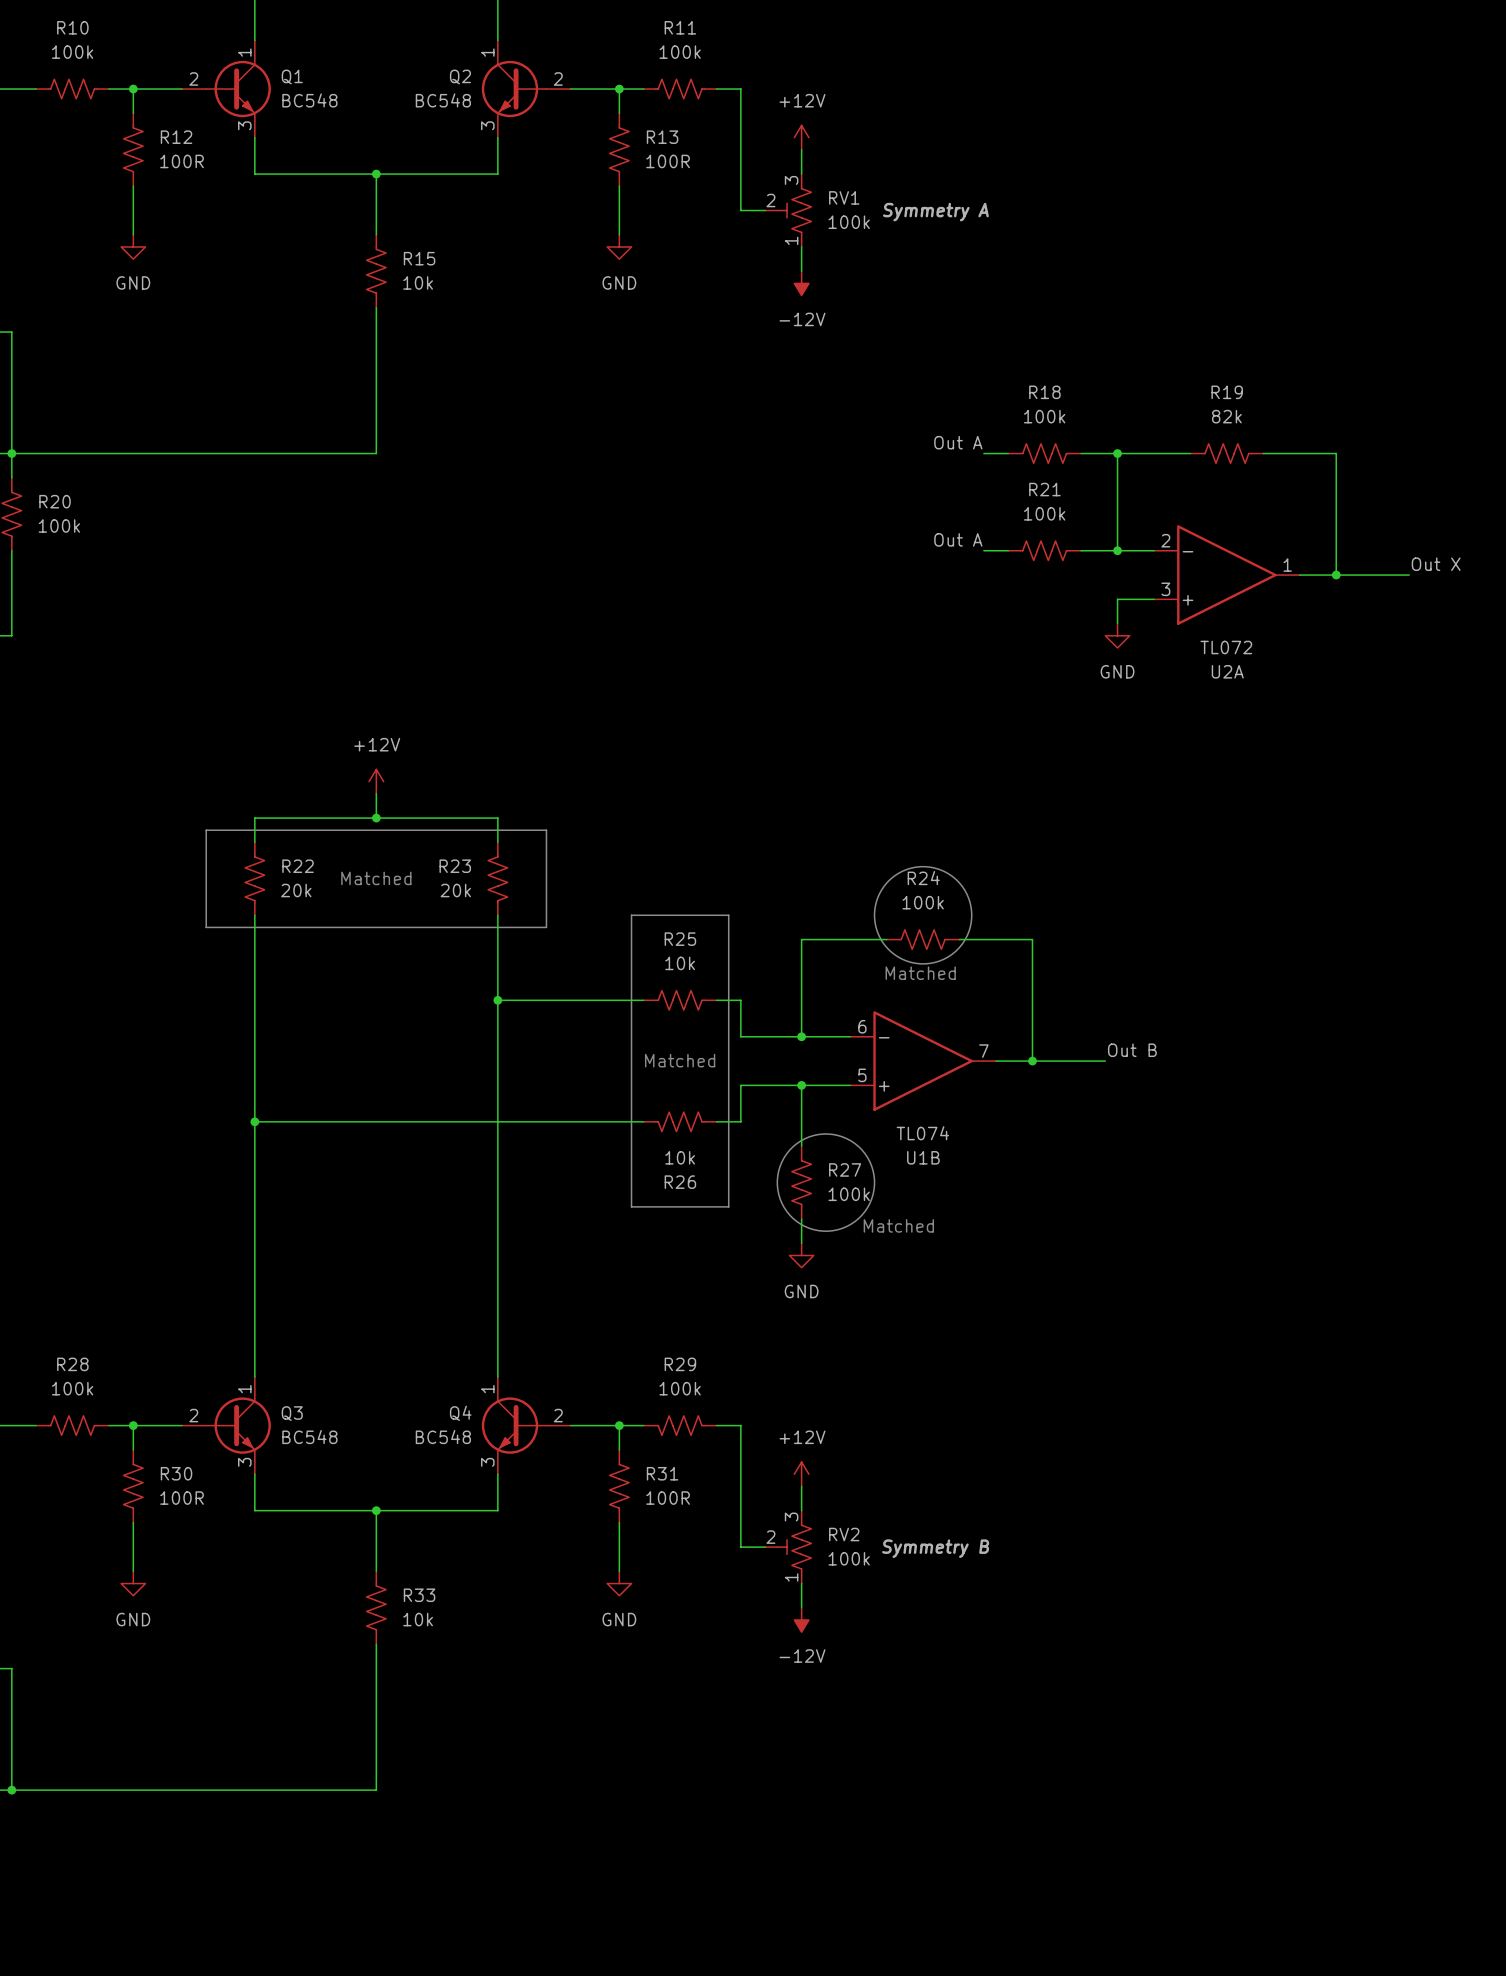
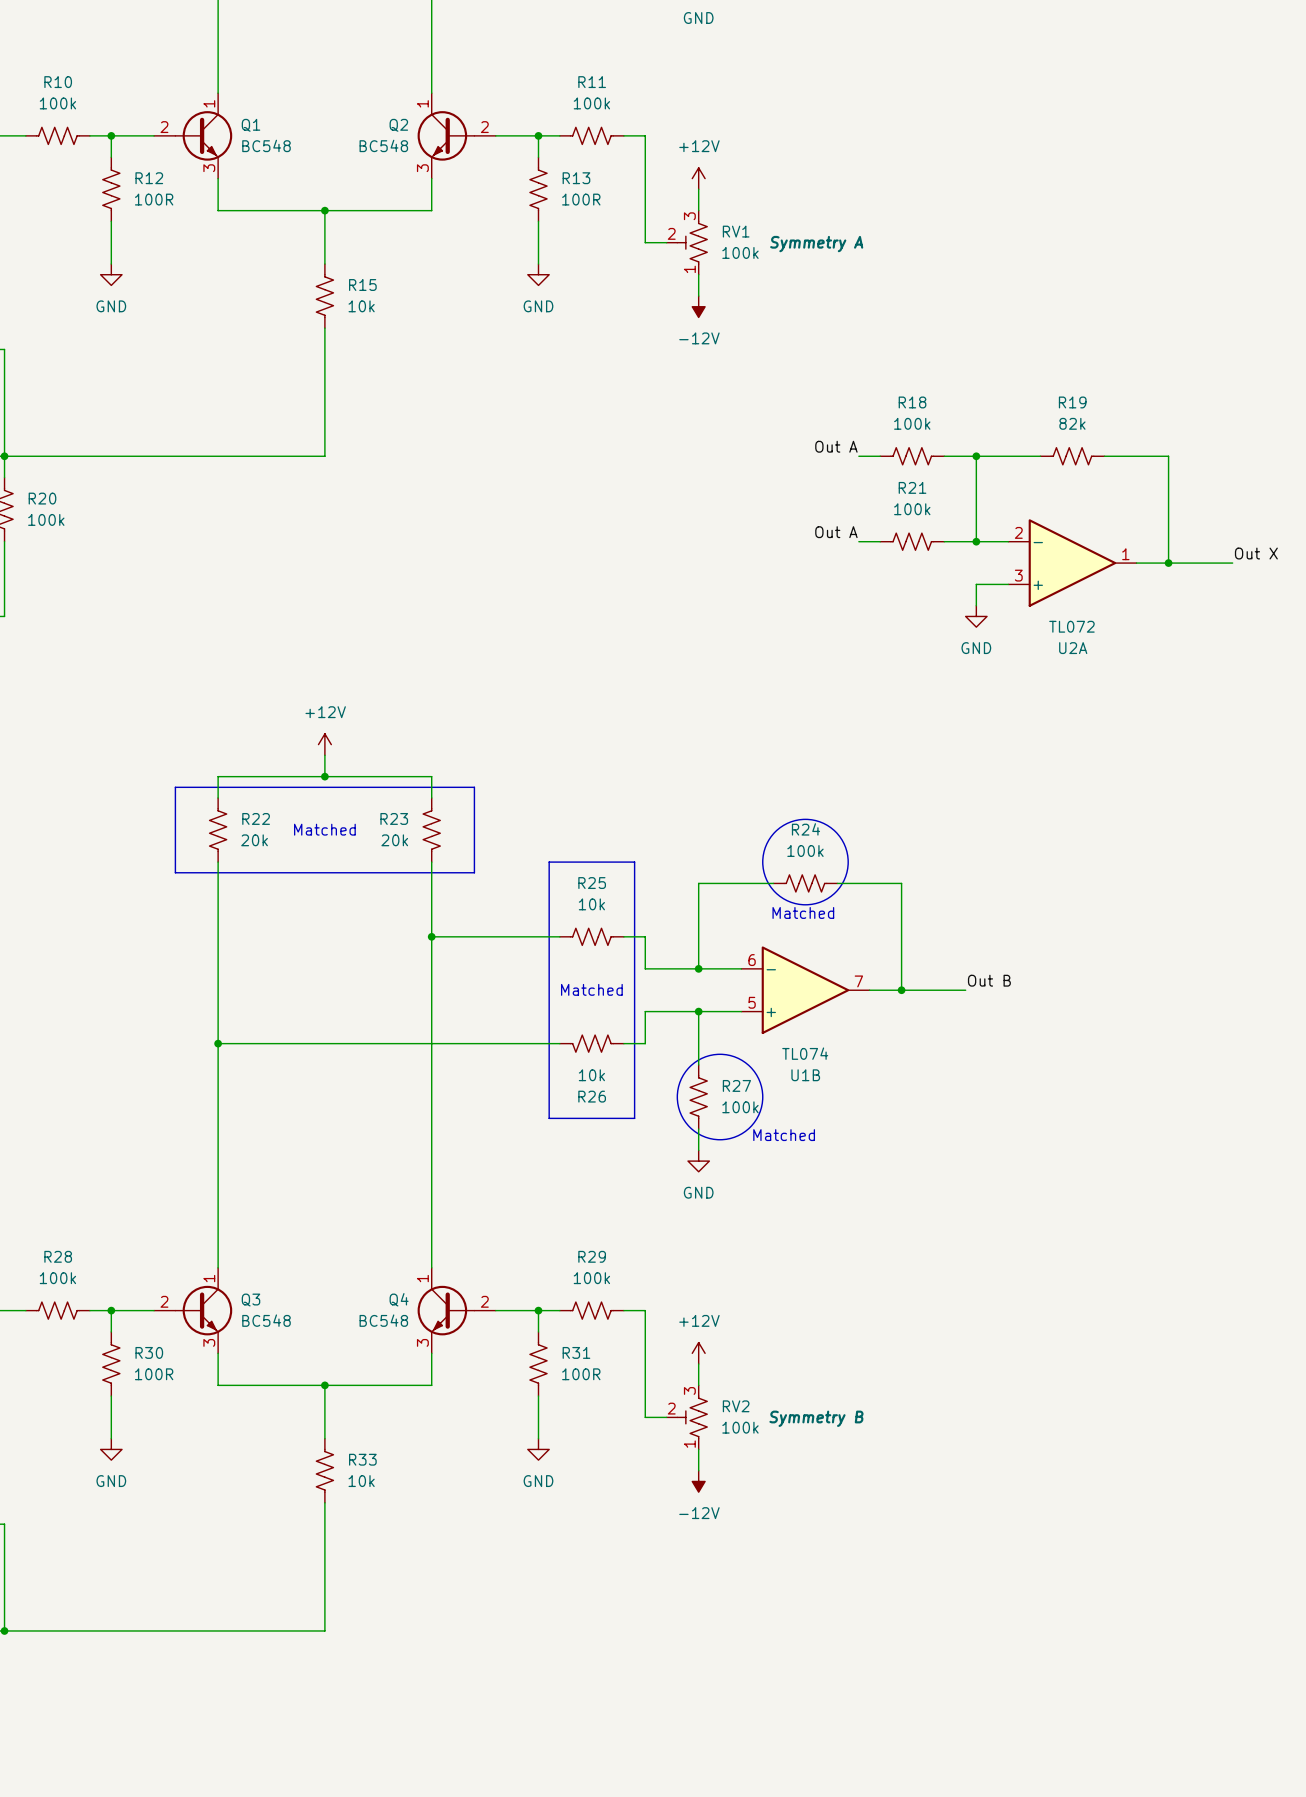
R29 flip: as is (680, 1425) -> left-right (591, 1310)

